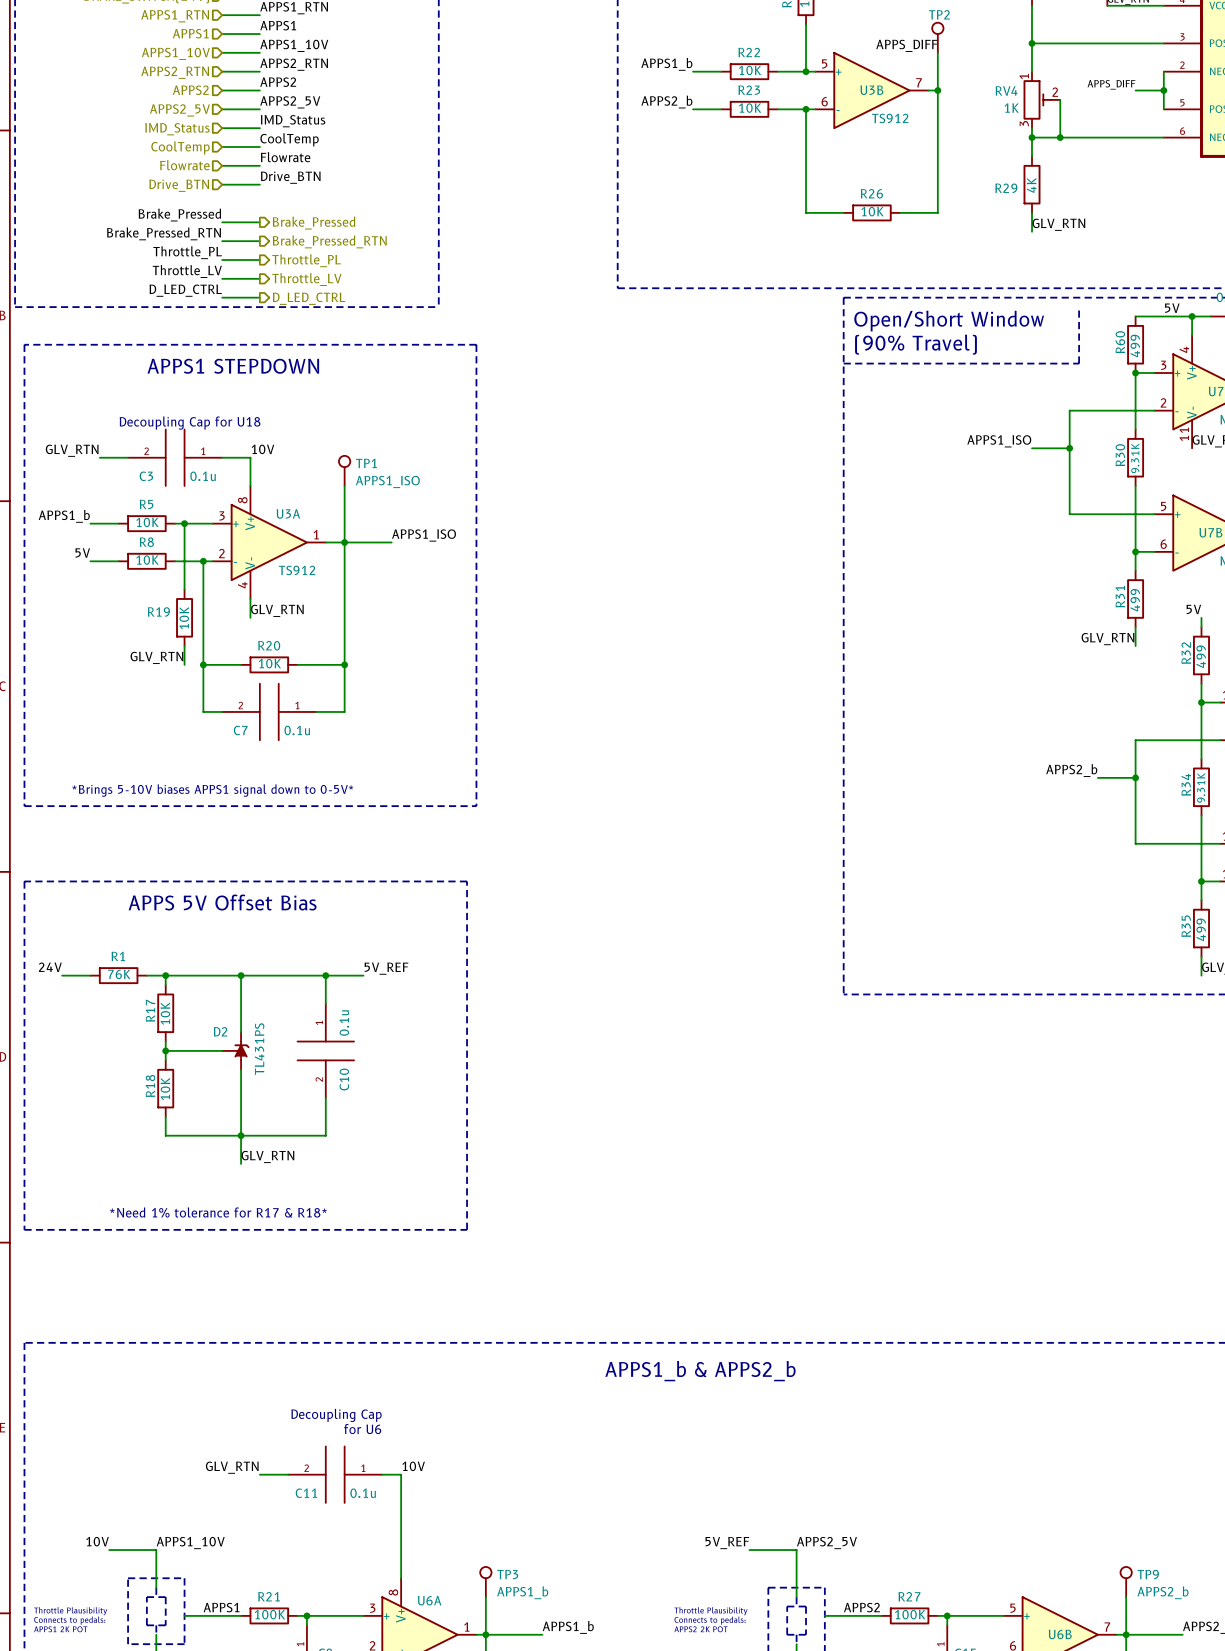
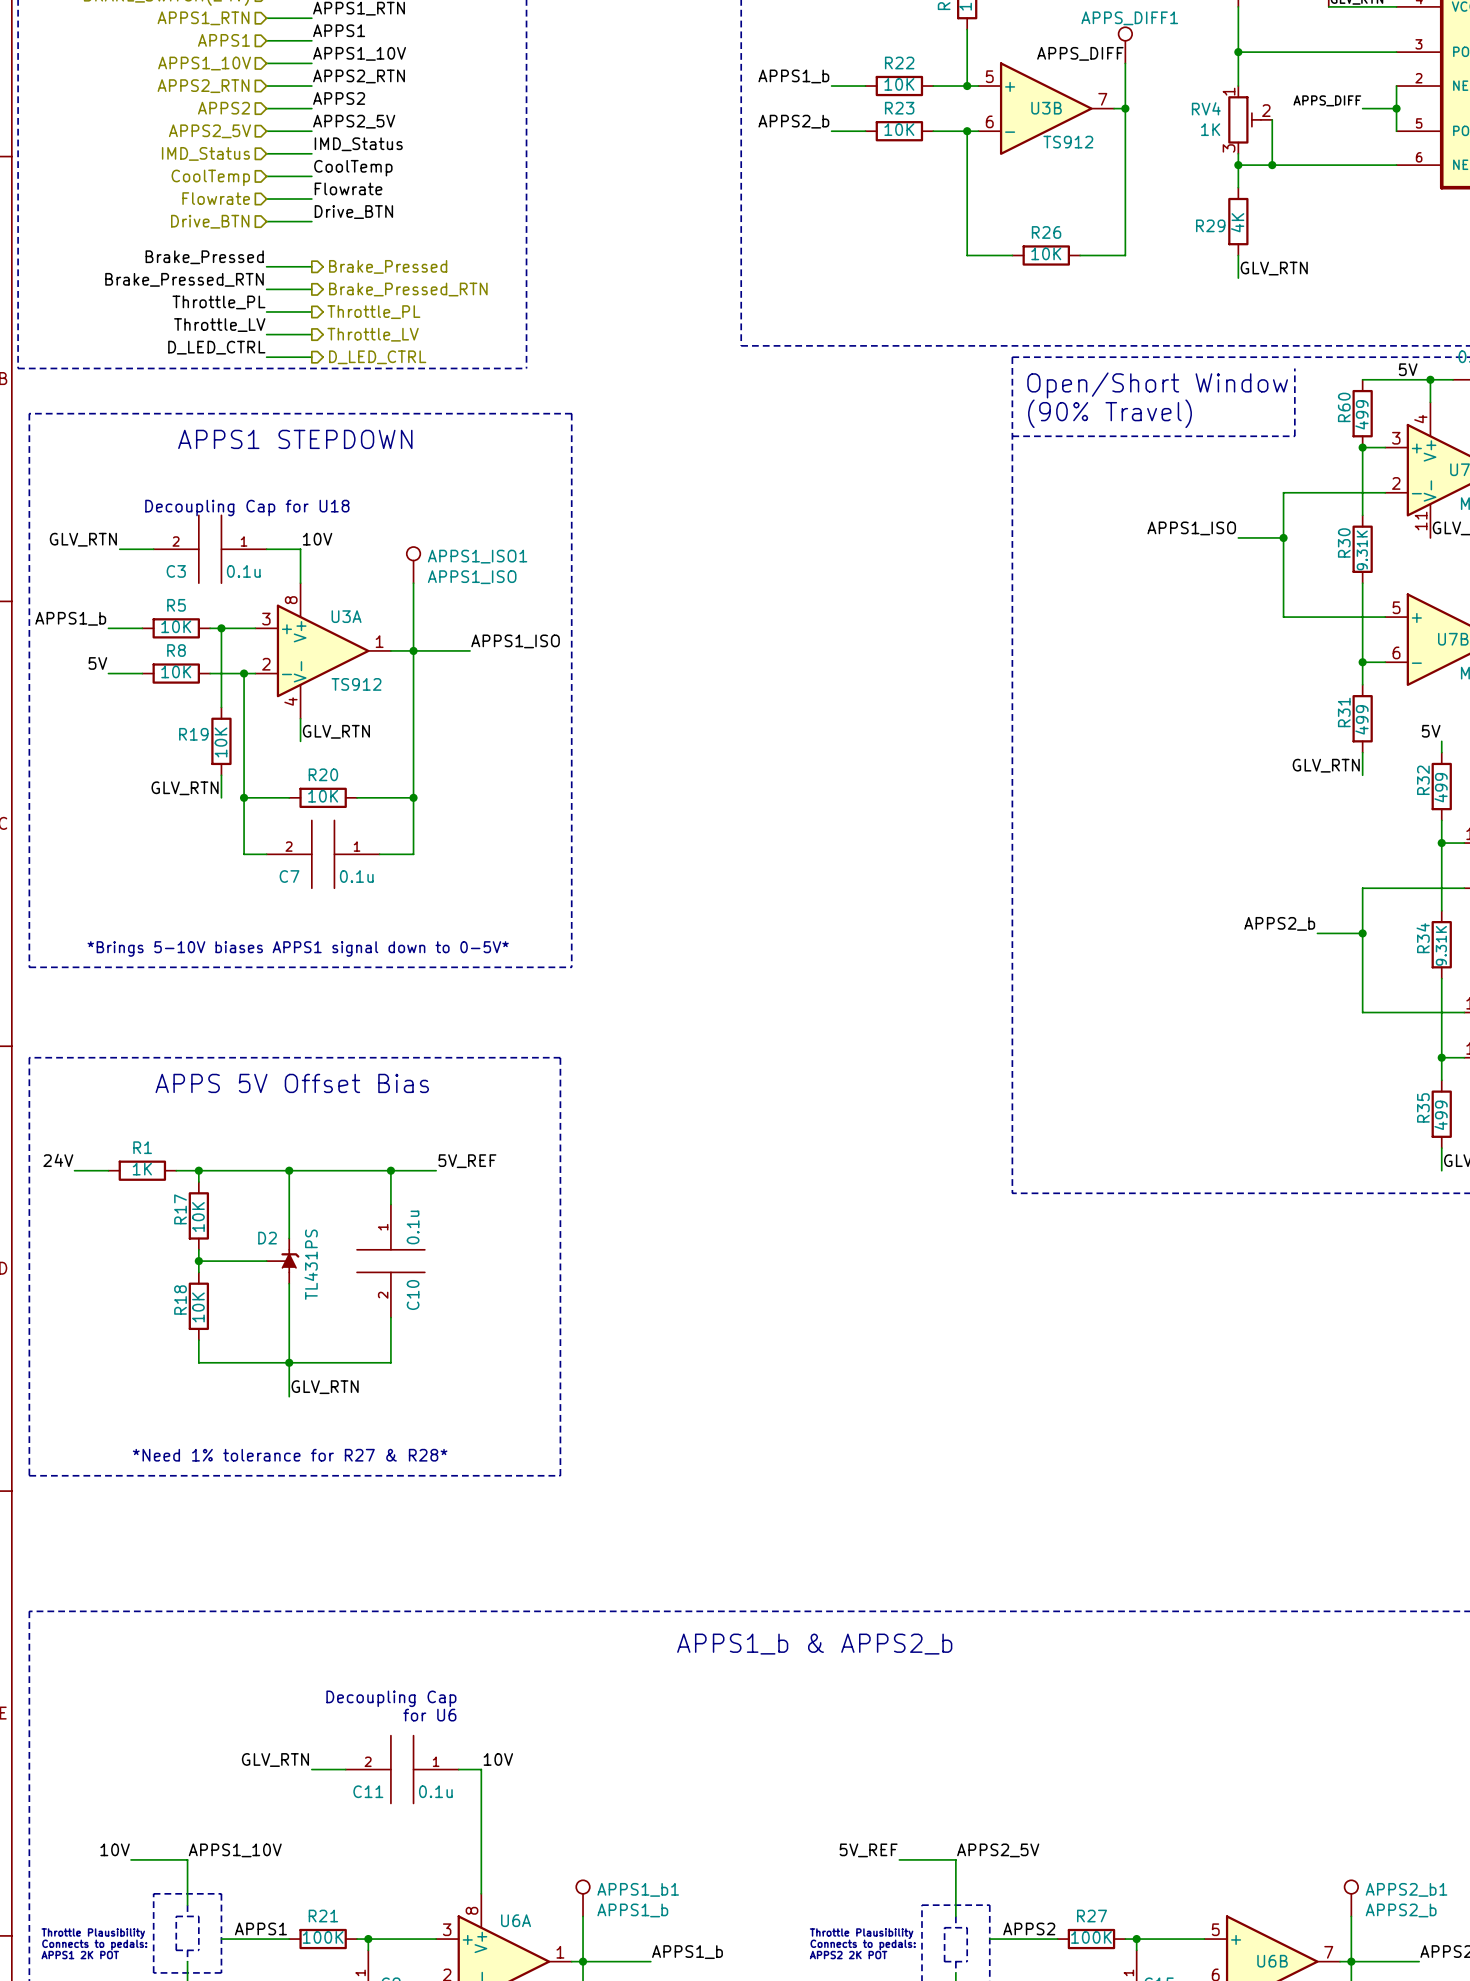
TP2 name: TP2 (939, 14) -> APPS_DIFF1 (1129, 18)
TP1 name: TP1 (366, 463) -> APPS1_ISO1 (477, 556)
R1 value: 76K (119, 974) -> 1K (142, 1169)
text: *Need 1% tolerance for R17 & R18* (218, 1212) -> *Need 1% tolerance for R27 & R28* (290, 1455)
TP3 name: TP3 (507, 1574) -> APPS1_b1 (638, 1889)
TP9 name: TP9 (1148, 1574) -> APPS2_b1 (1406, 1889)

